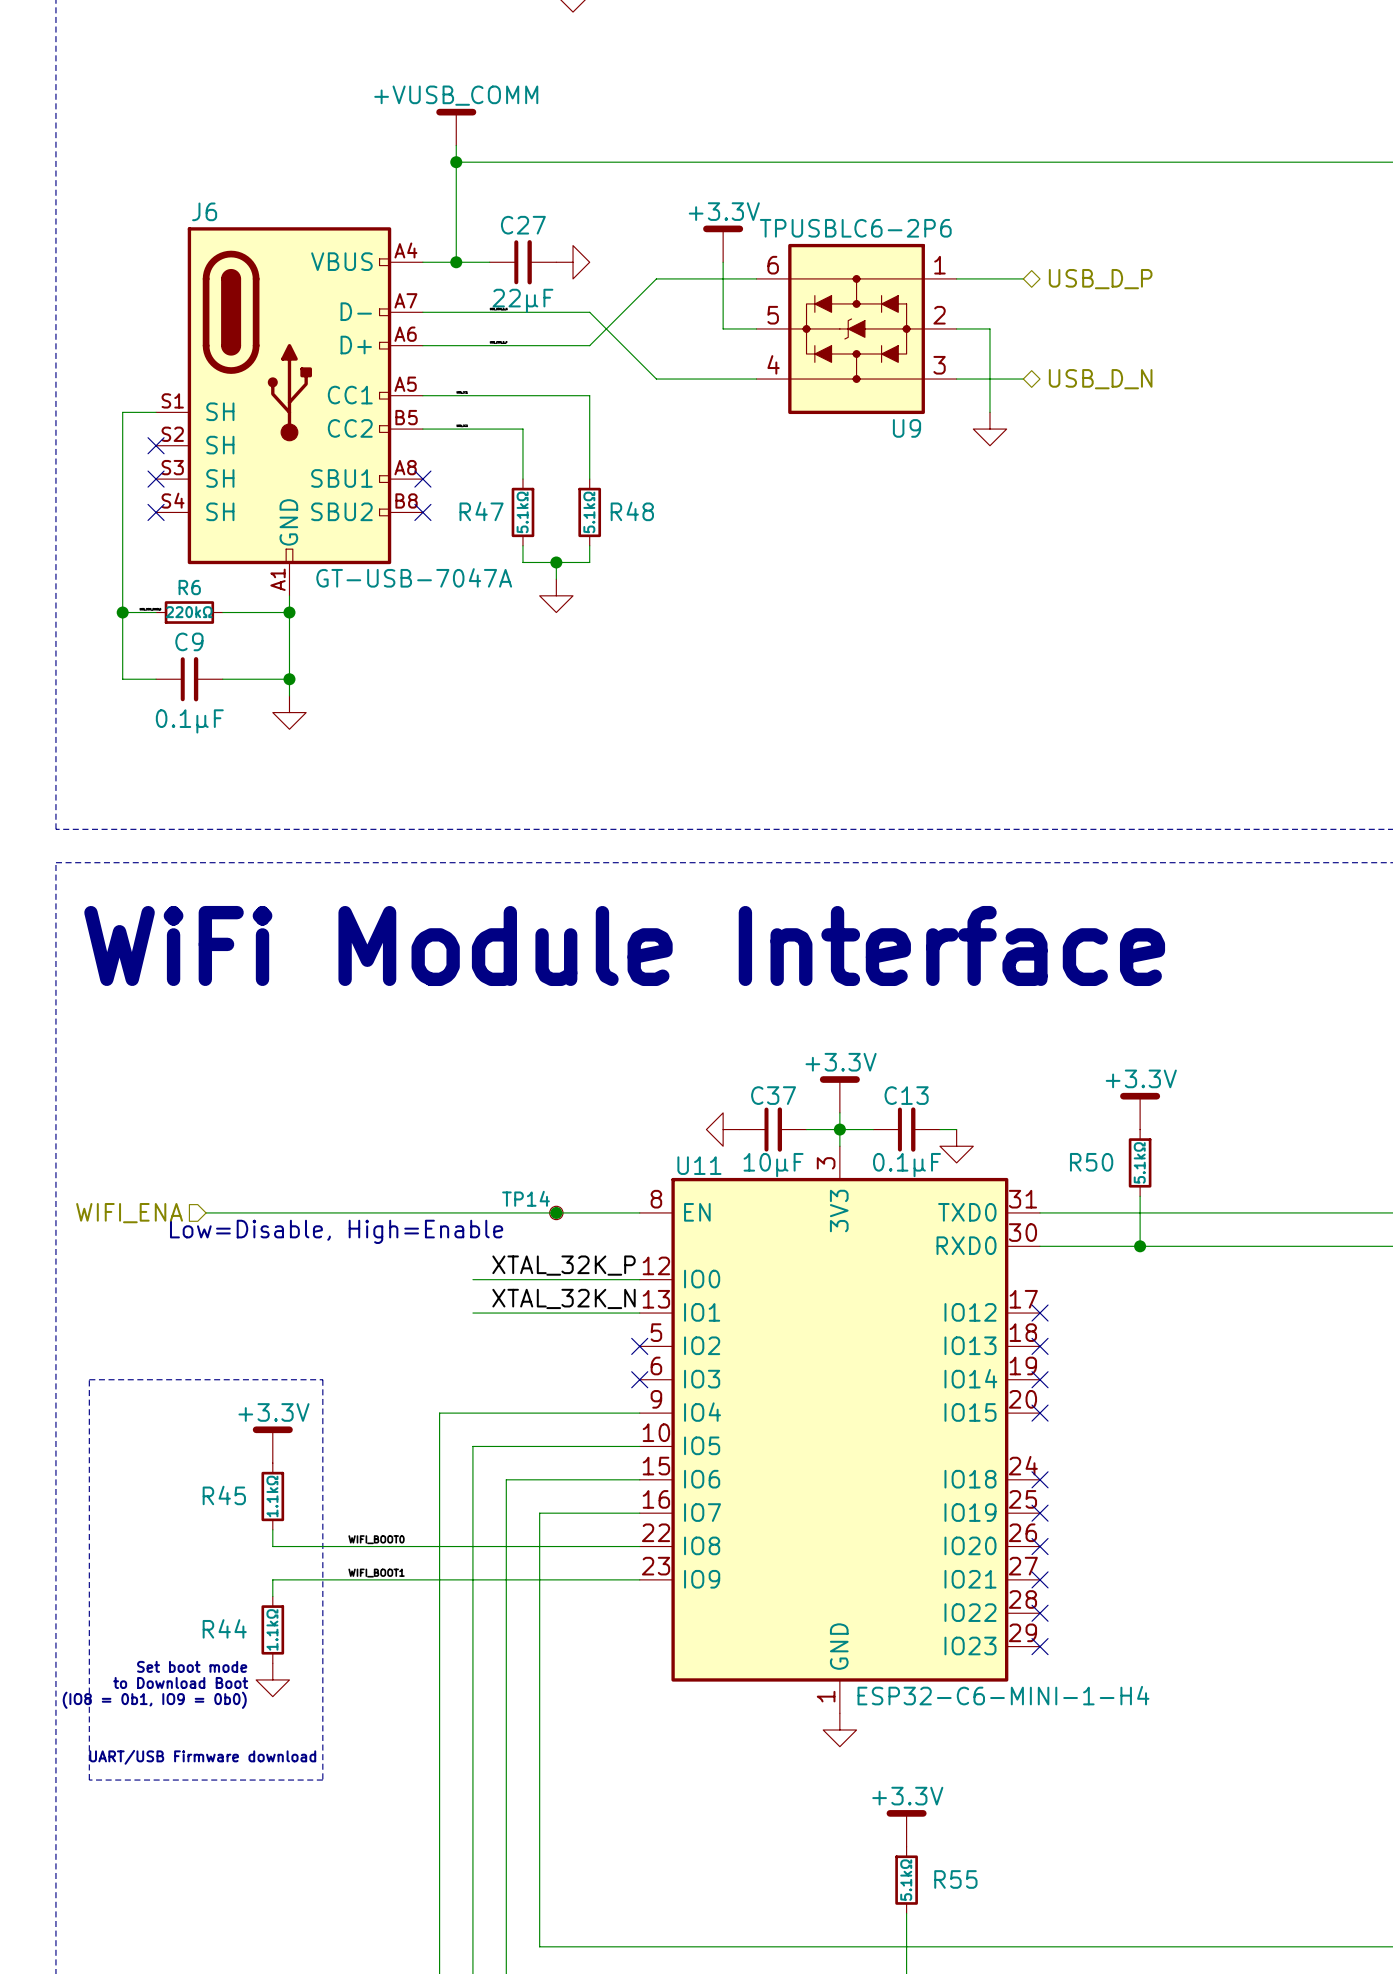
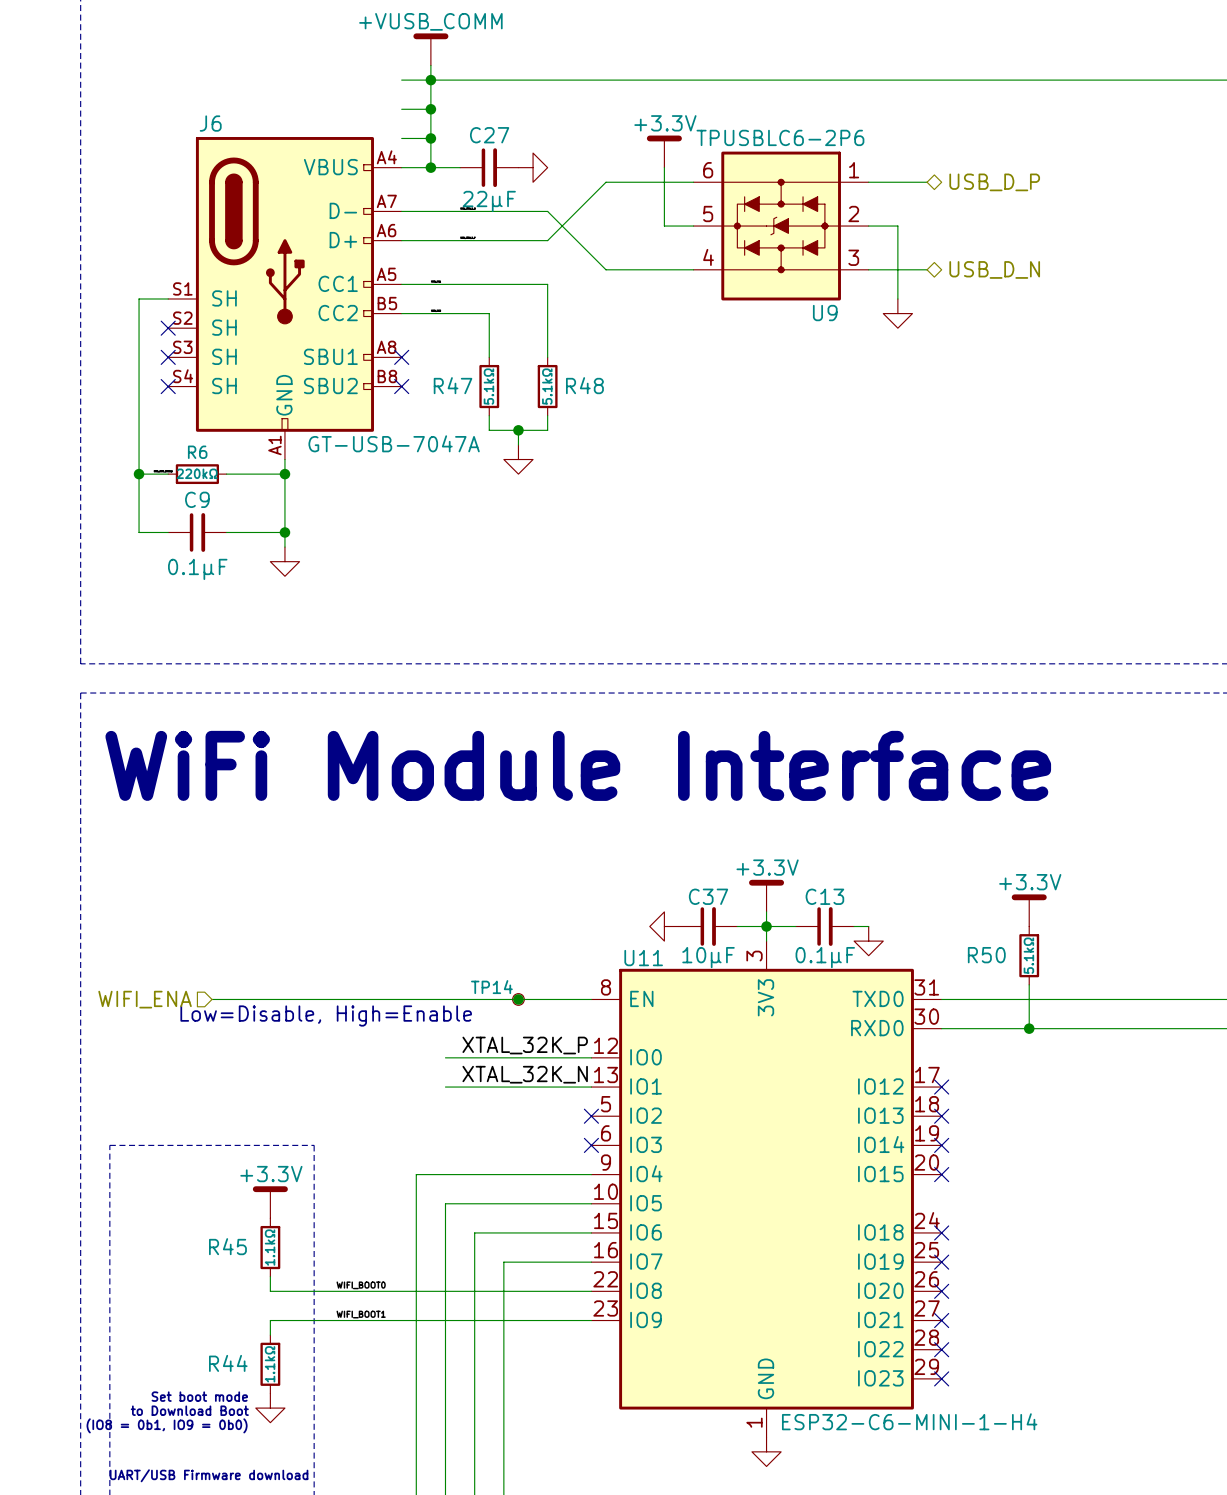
wire: none -> (401, 80) (430, 80)
wire: none -> (401, 109) (430, 109)
junction: none -> (430, 109)
wire: none -> (401, 138) (430, 138)
junction: none -> (430, 138)

